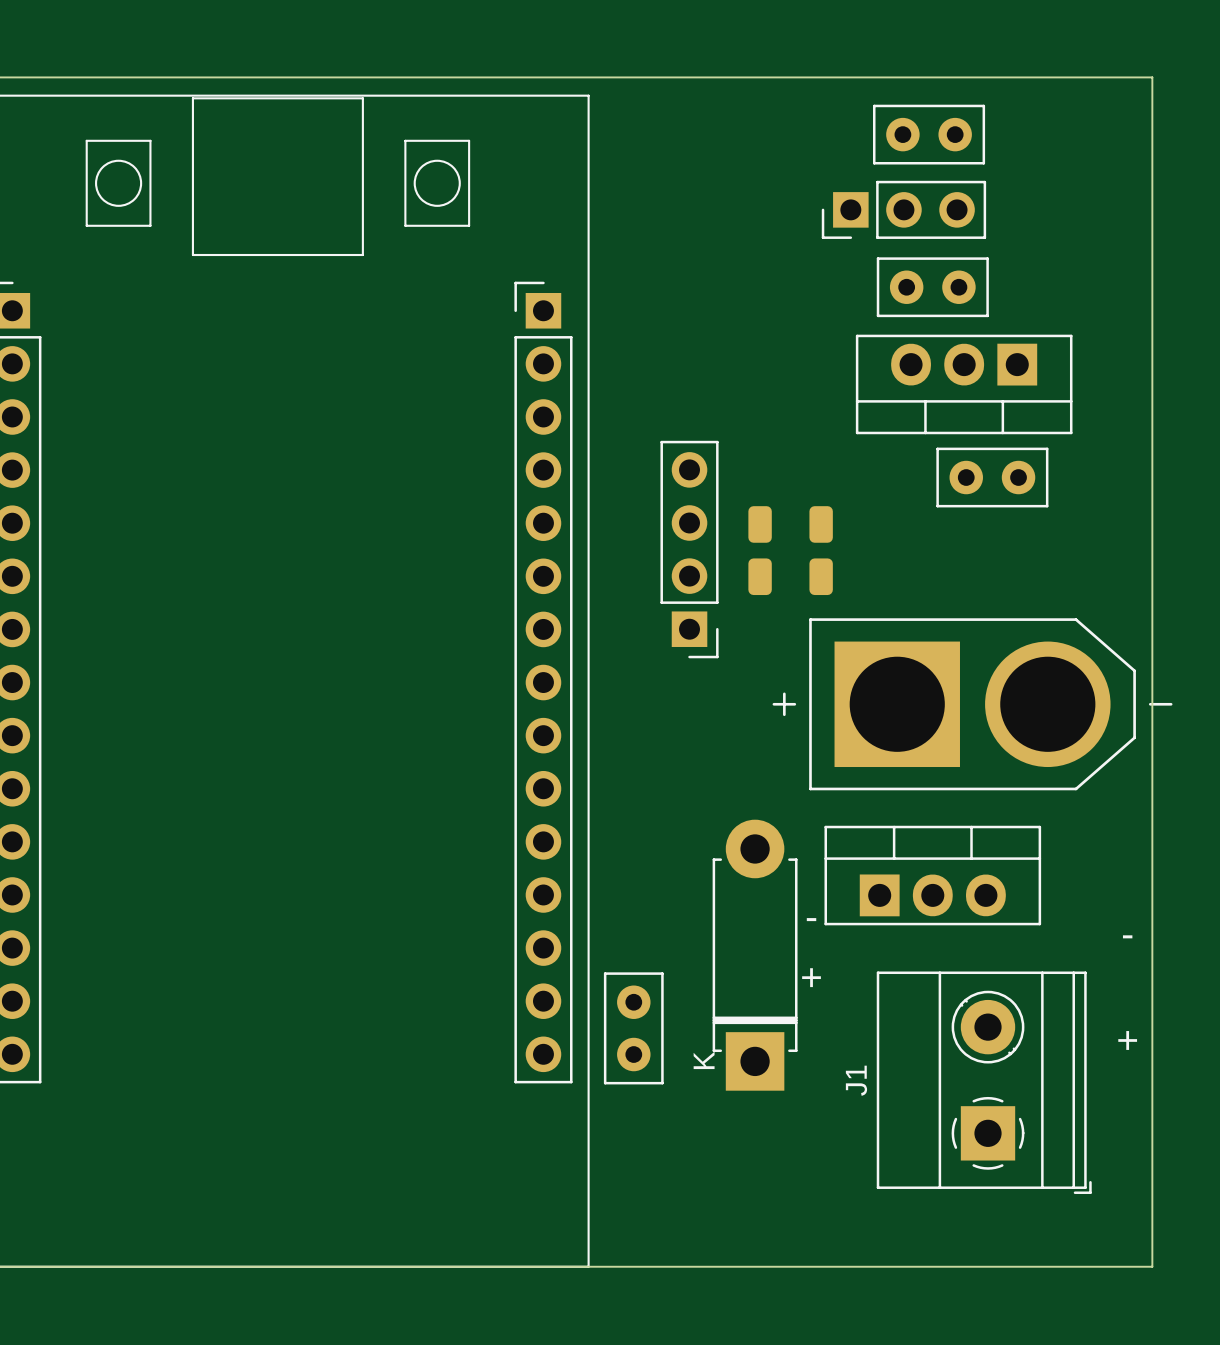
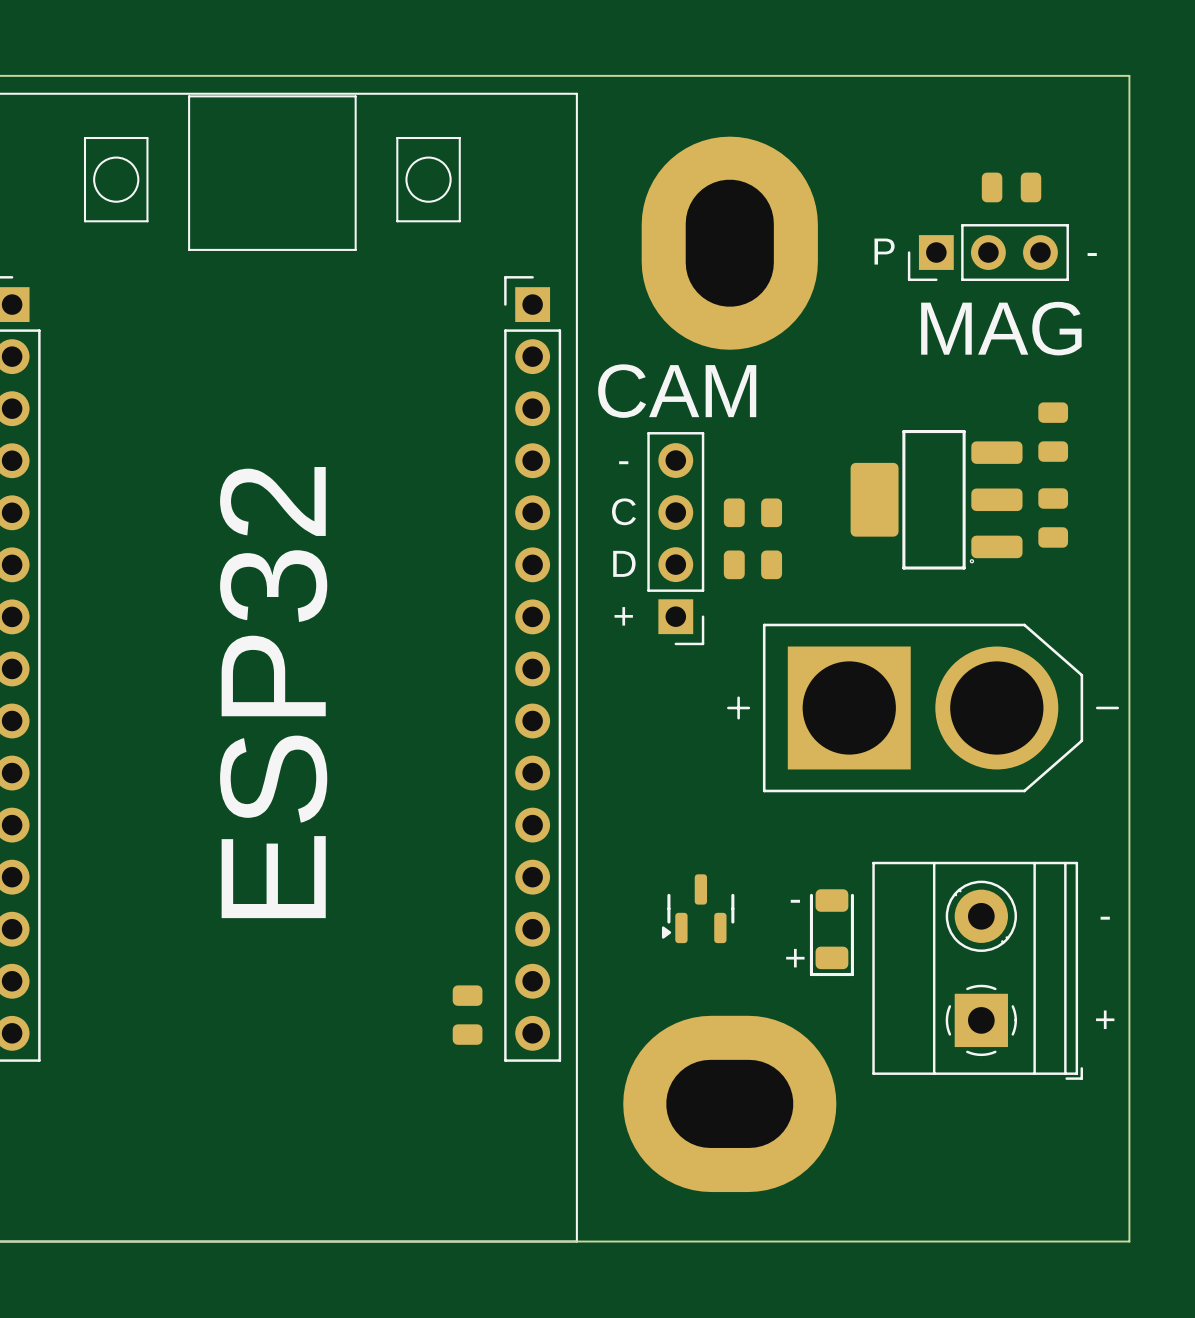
part: (929, 134) -> none
part: none -> (1011, 187)
part position: (903, 209) -> (988, 252)
part: none -> (729, 243)
text: none -> P (884, 251)
text: none -> - (1092, 254)
part: (932, 287) -> none
text: none -> MAG (1001, 328)
part: (964, 384) -> none
text: none -> CAM (677, 391)
part: none -> (1053, 432)
text: none -> - (623, 462)
part: (992, 477) -> none
part: none -> (936, 499)
text: none -> C (623, 511)
part: none -> (752, 512)
part: (790, 524) -> none
part: none -> (1053, 517)
text: none -> D (624, 563)
part: none -> (752, 564)
part: (790, 576) -> none
text: none -> + (623, 616)
part position: (972, 704) -> (923, 707)
text: none -> ESP32 (273, 692)
part: (932, 875) -> none
part: none -> (698, 908)
part: none -> (831, 932)
part: (755, 955) -> none
part: none -> (977, 970)
part: (633, 1028) -> none
part: none -> (467, 1015)
J1: (984, 1082) -> none
part: none -> (729, 1103)

